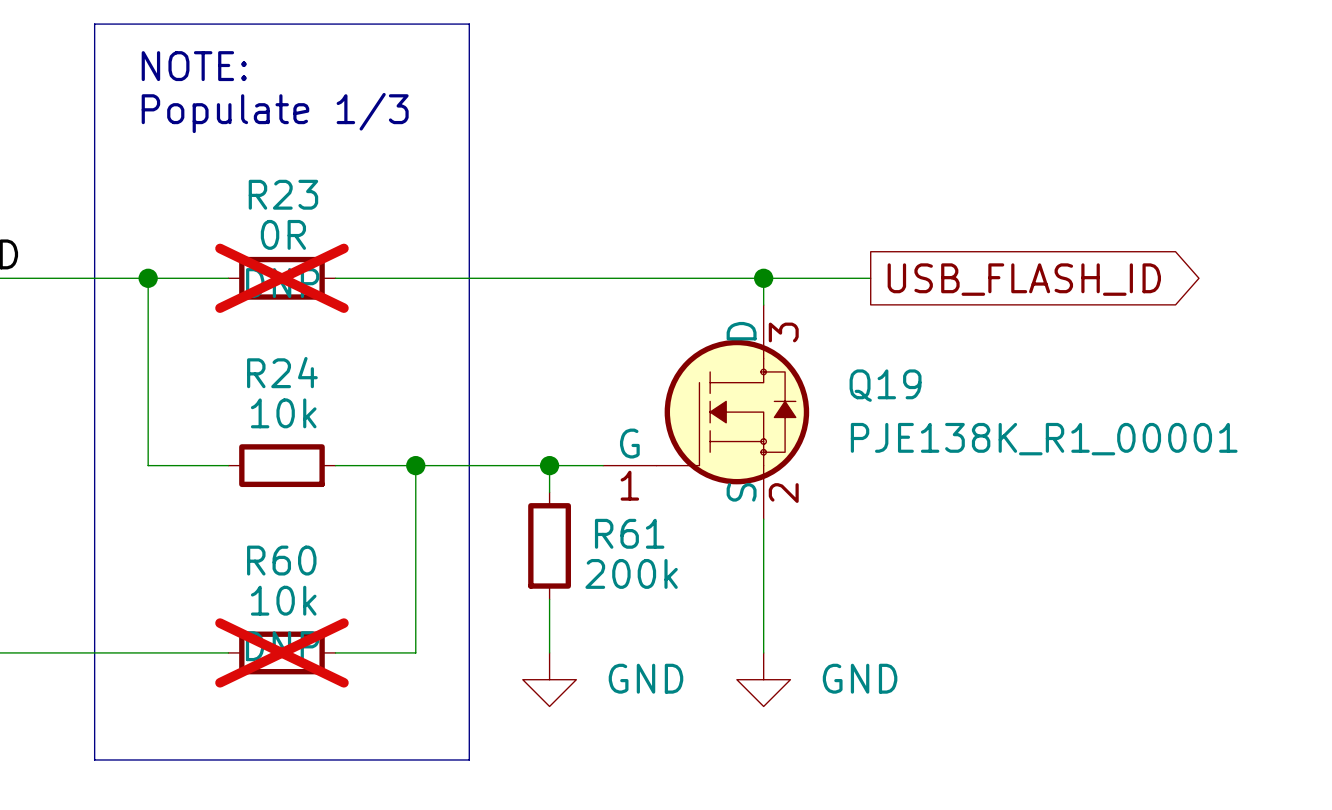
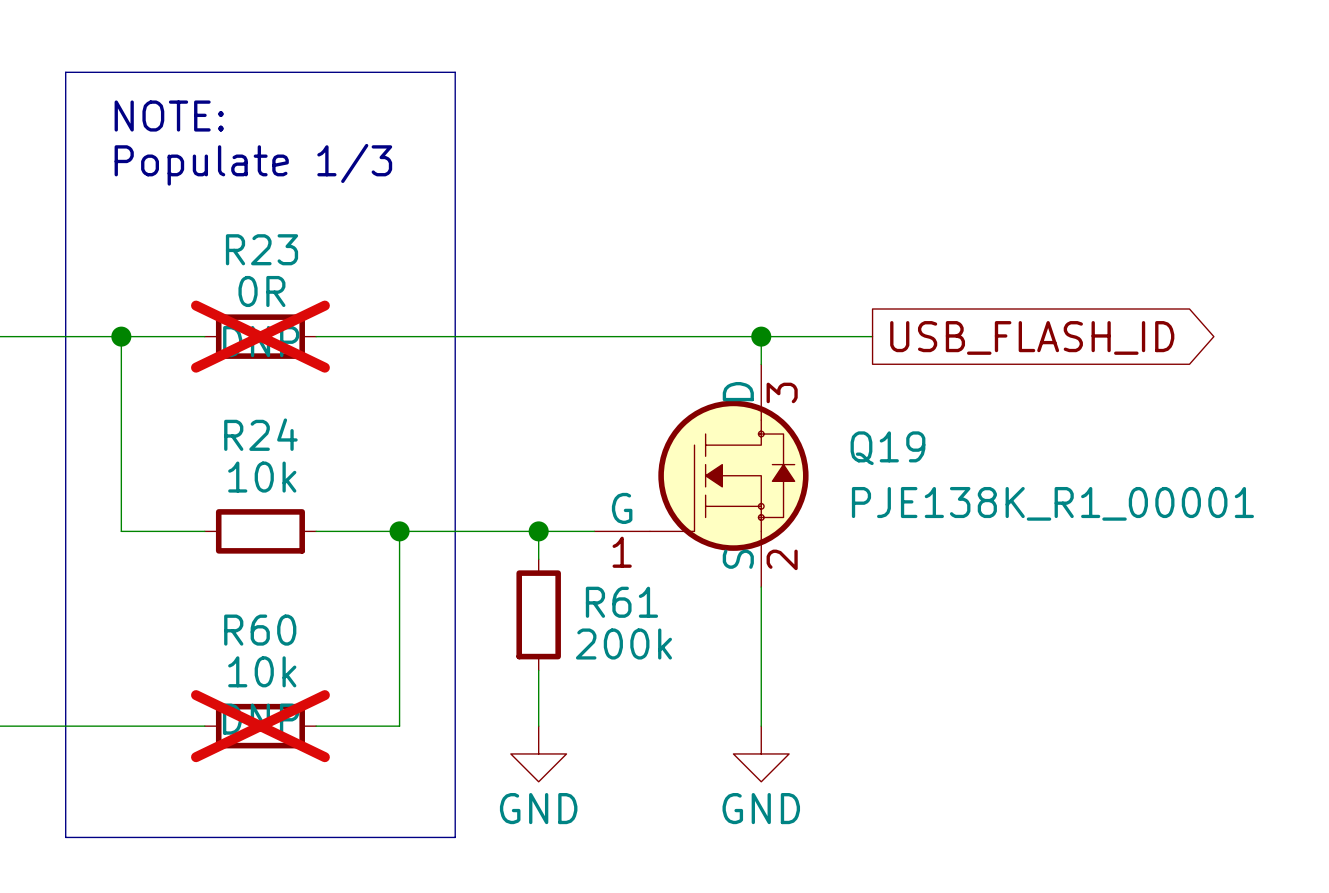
power symbol text position: GND (645, 678) -> GND (538, 808)
power symbol text position: GND (860, 678) -> GND (761, 808)

